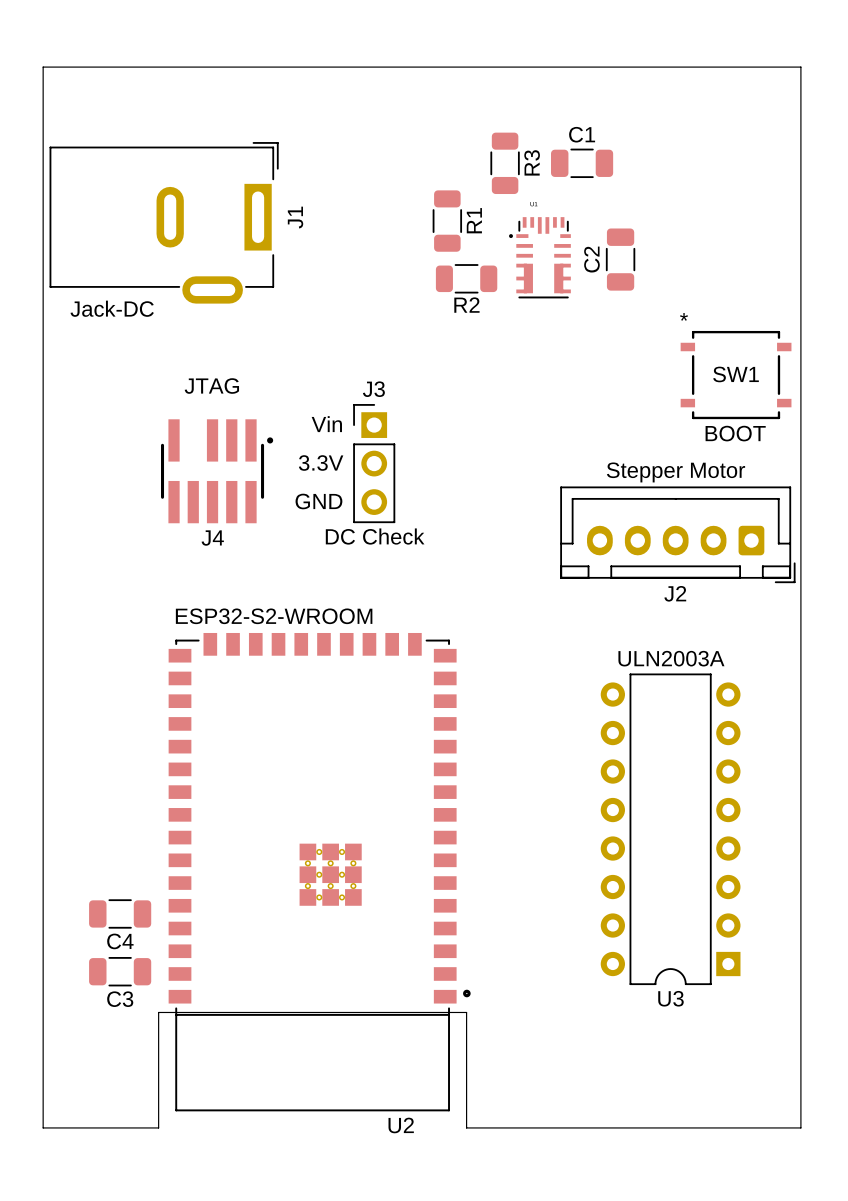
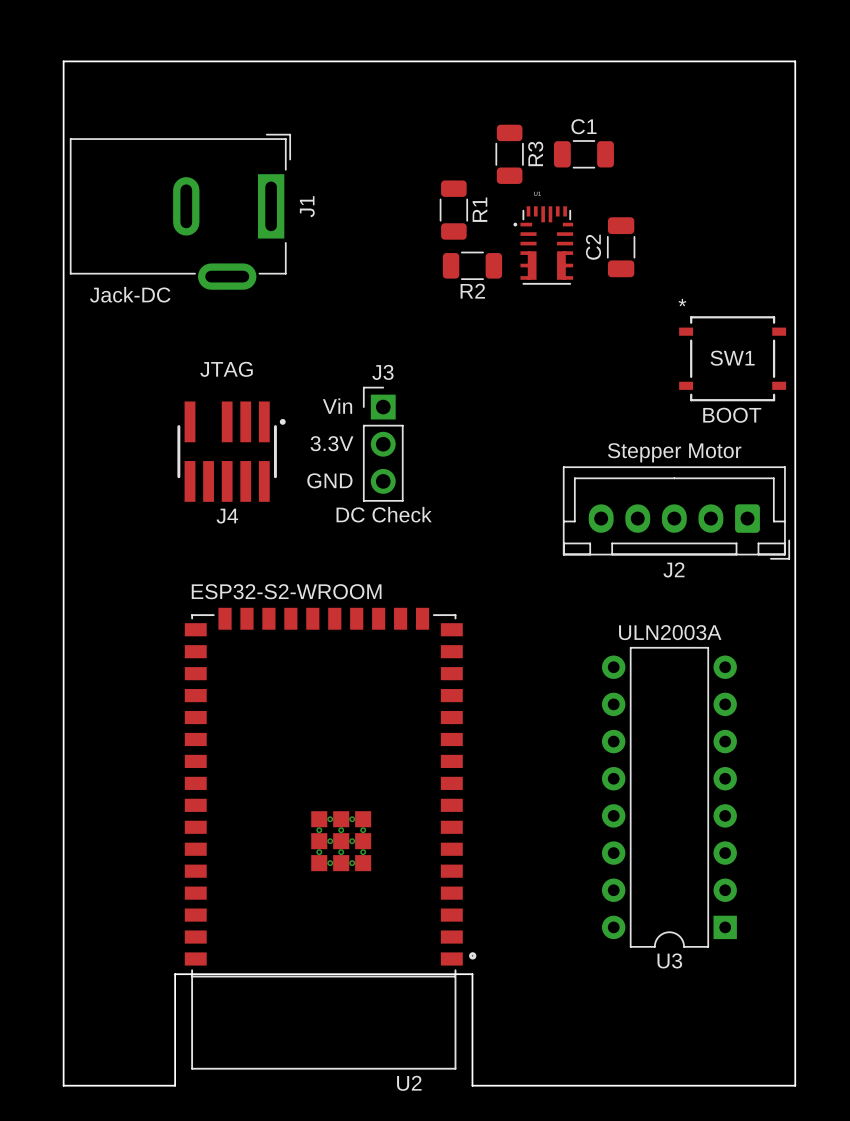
C4: (120, 913) -> none
C3: (120, 971) -> none

